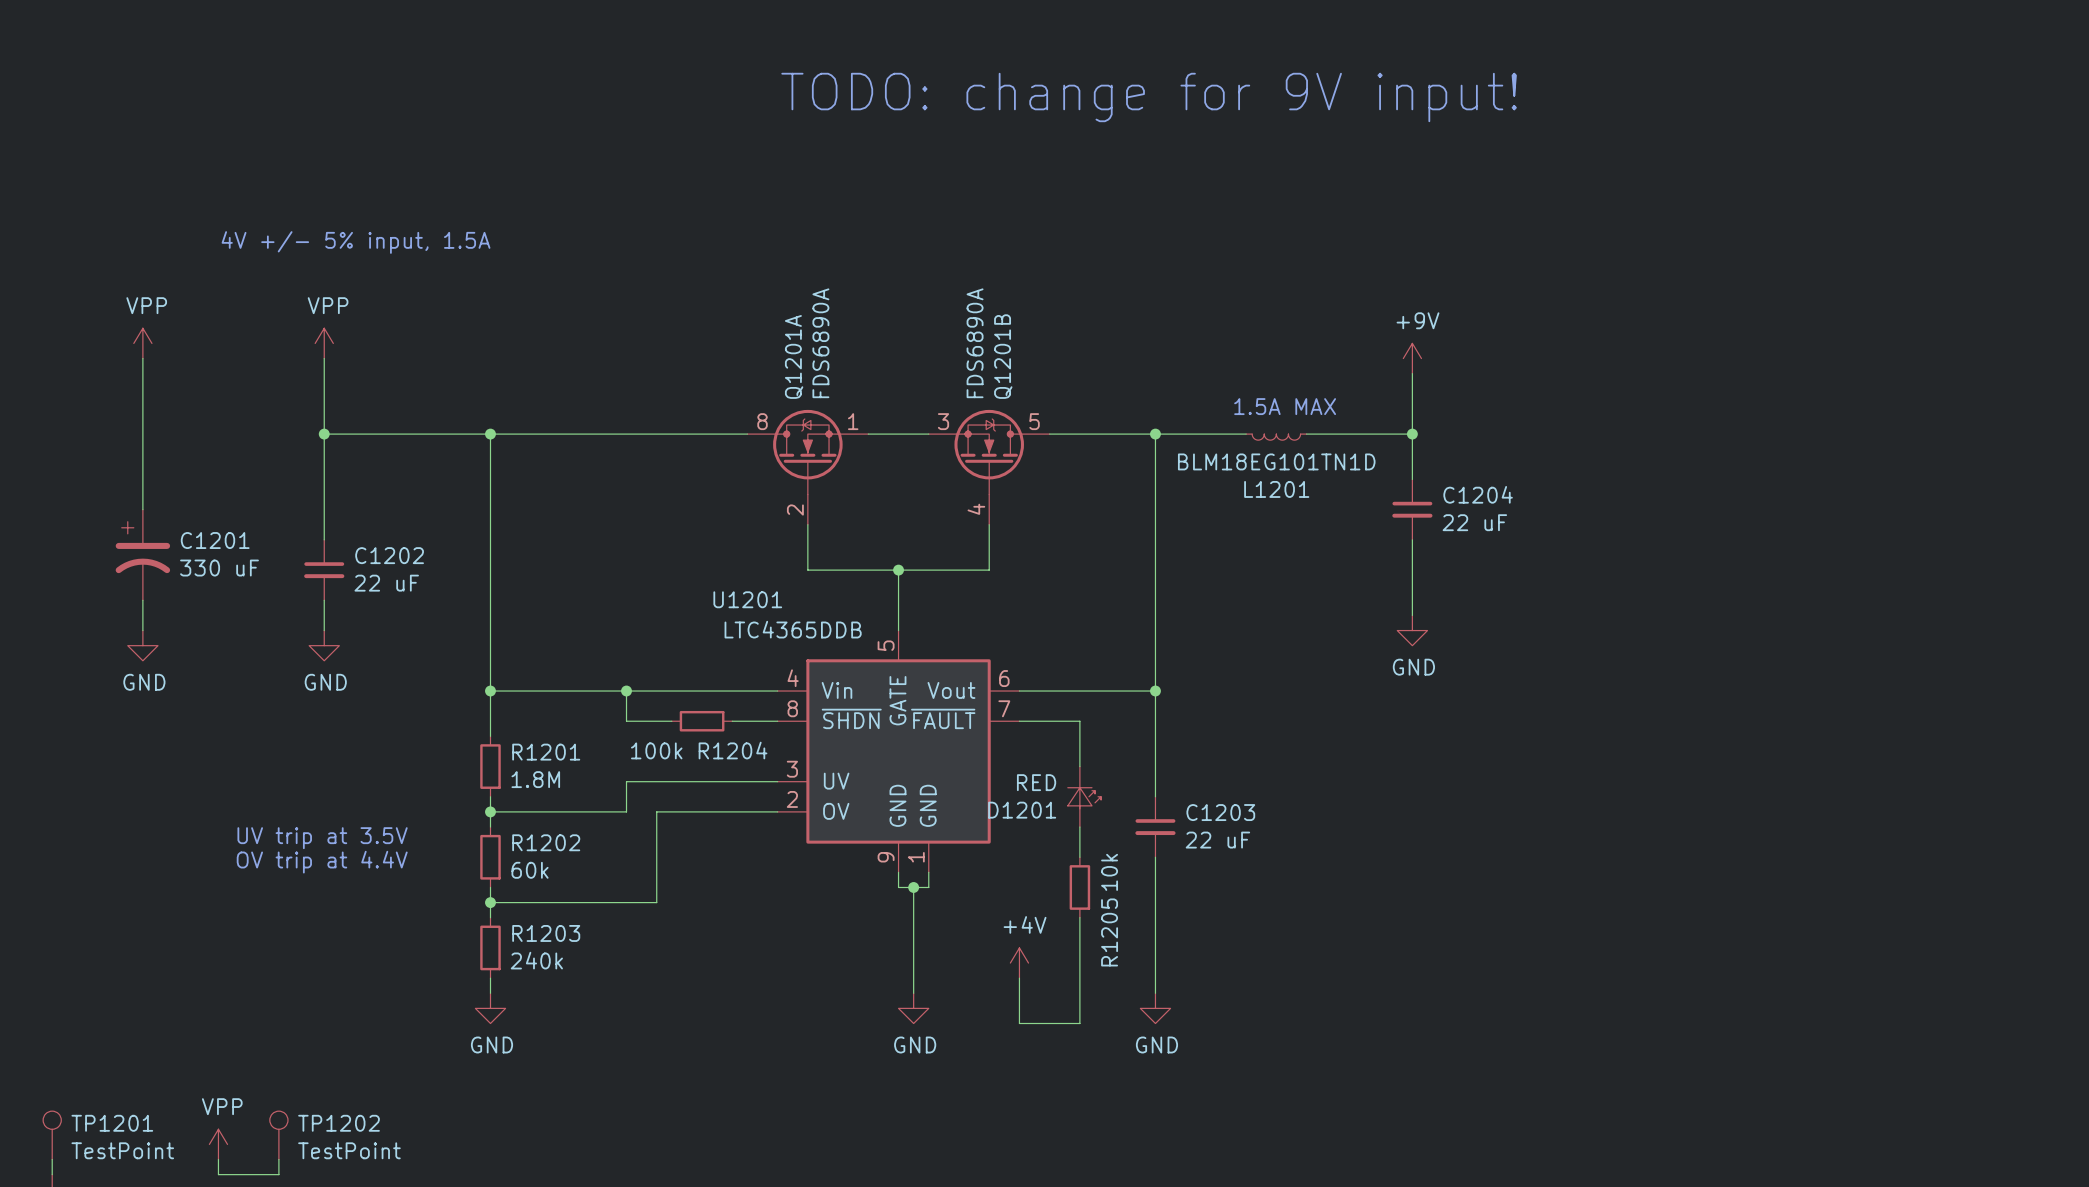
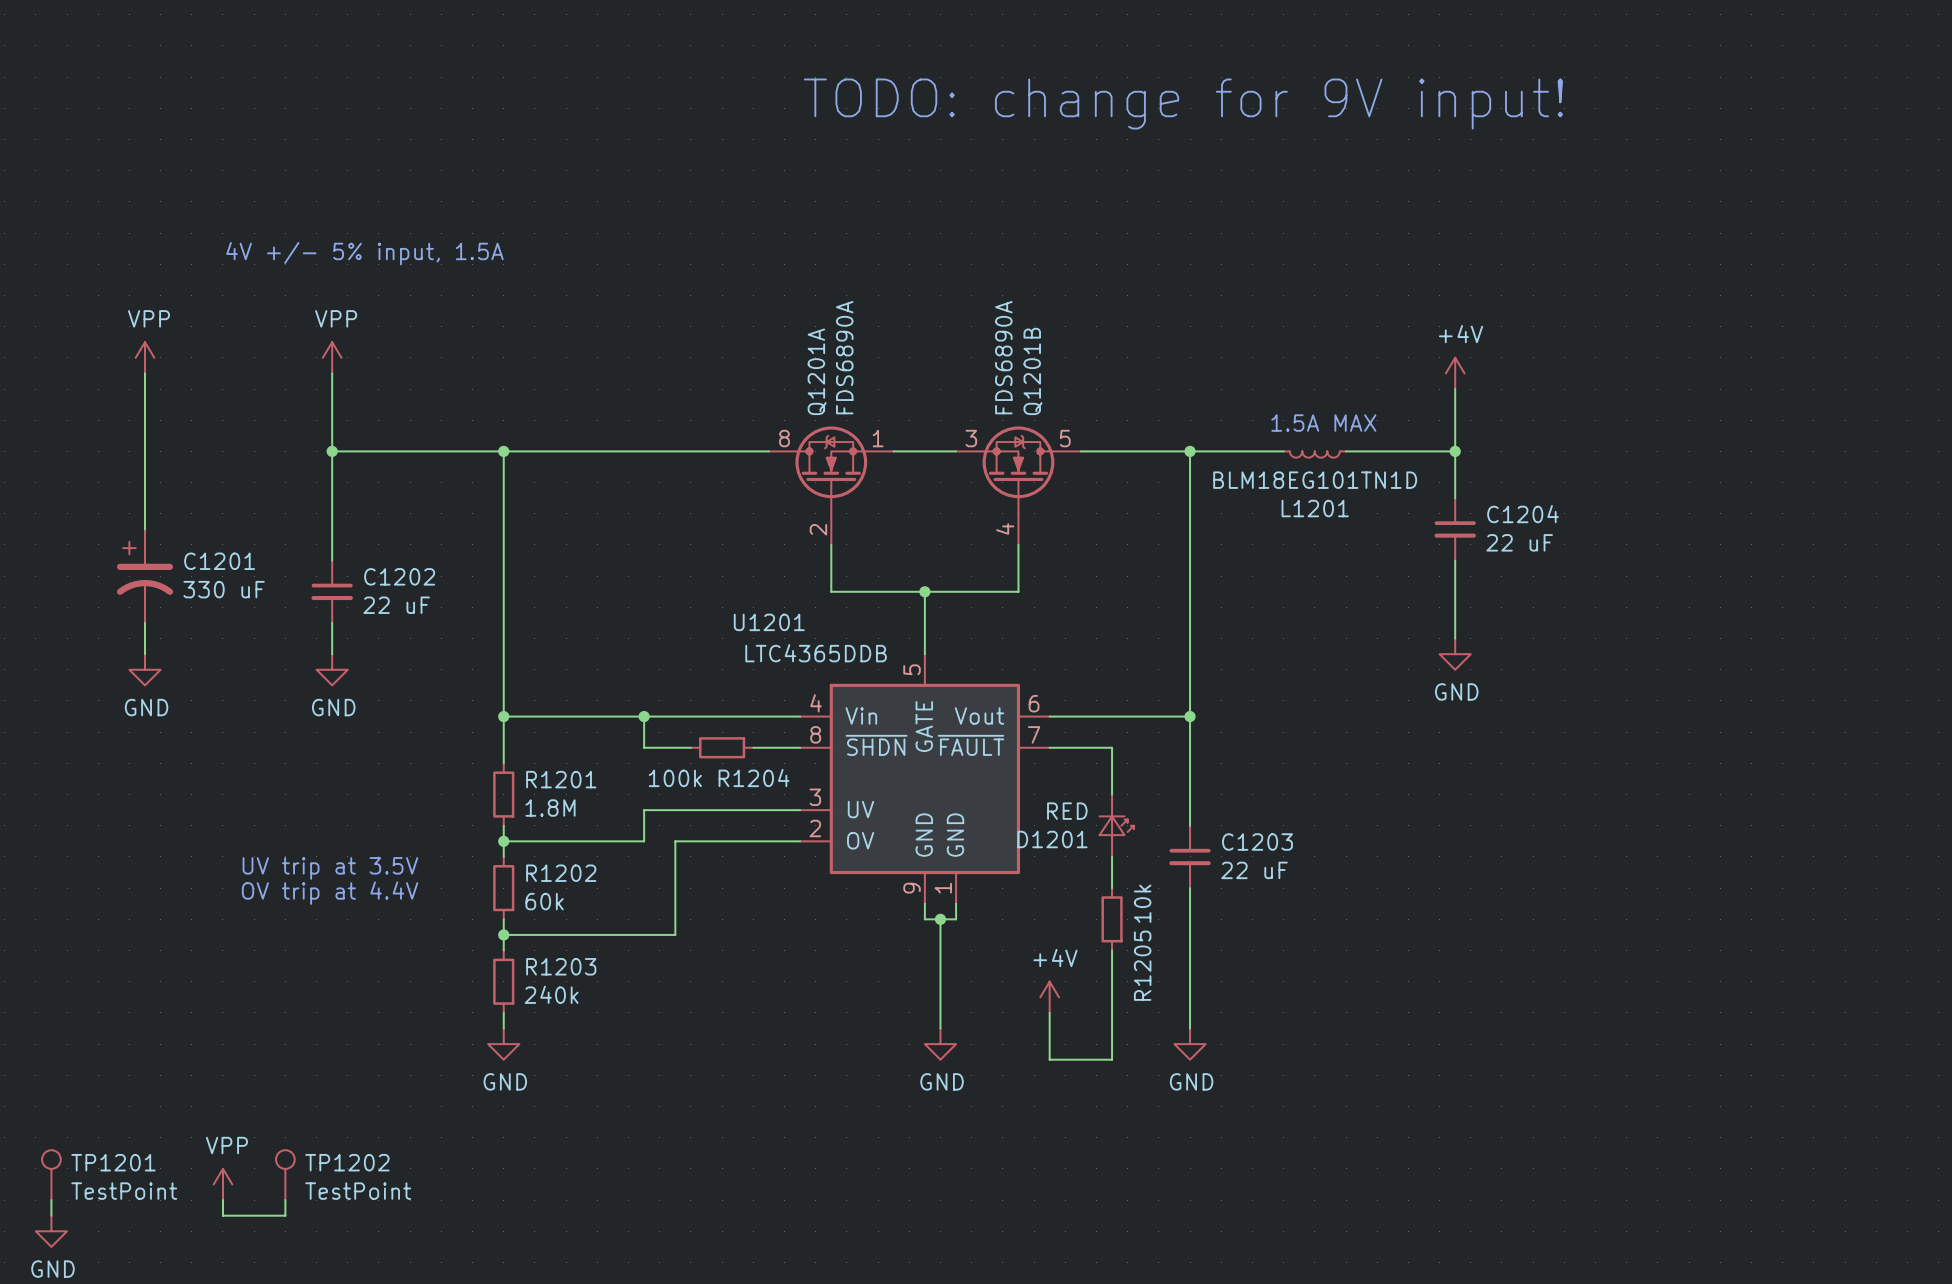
power symbol: +9V (1412, 358) -> +4V (1455, 373)

